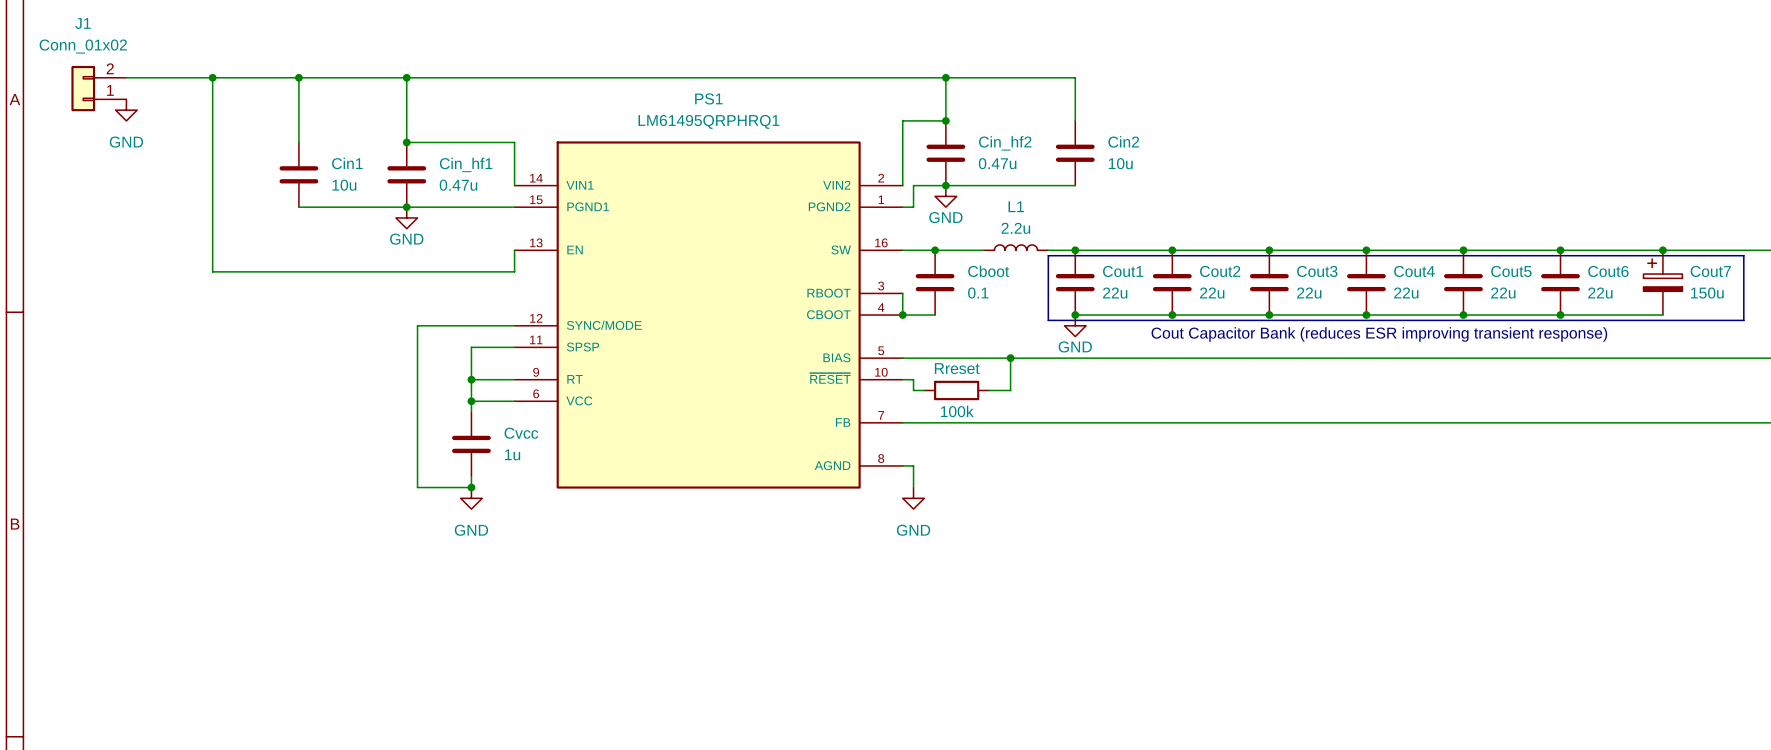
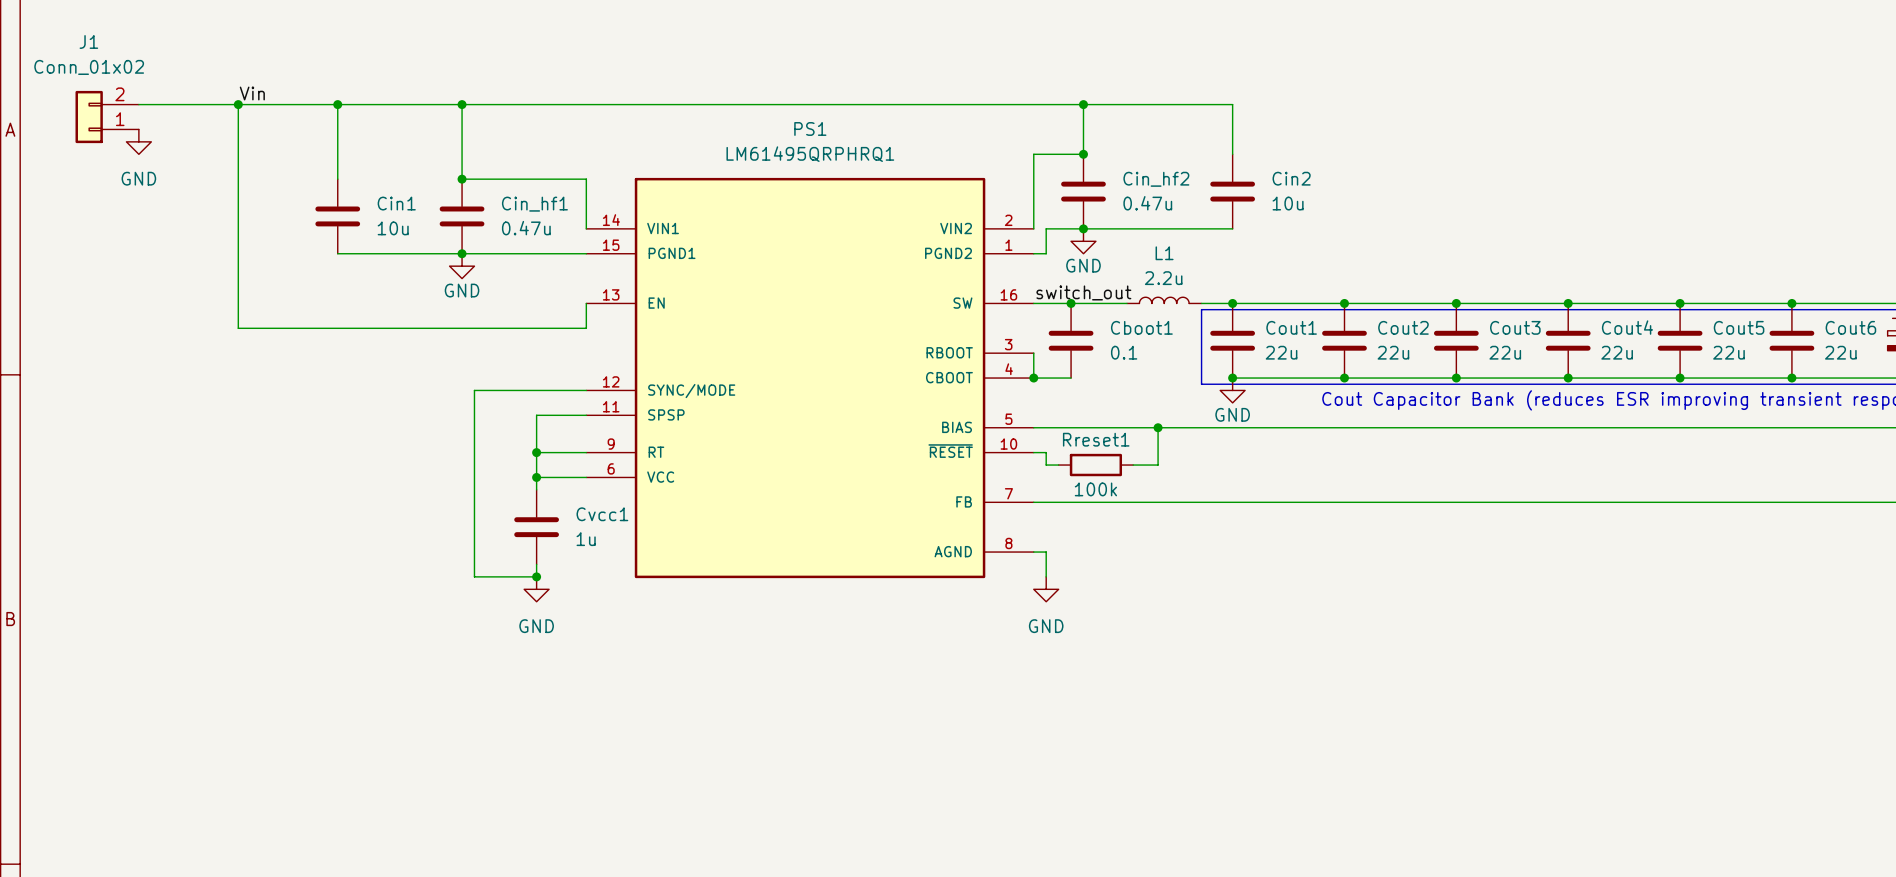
label: none -> Vin (252, 93)
label: none -> switch_out (1083, 292)
Cboot name: Cboot (988, 271) -> Cboot1 (1141, 327)
Rreset name: Rreset (957, 368) -> Rreset1 (1096, 439)
Cvcc name: Cvcc (521, 433) -> Cvcc1 (602, 514)

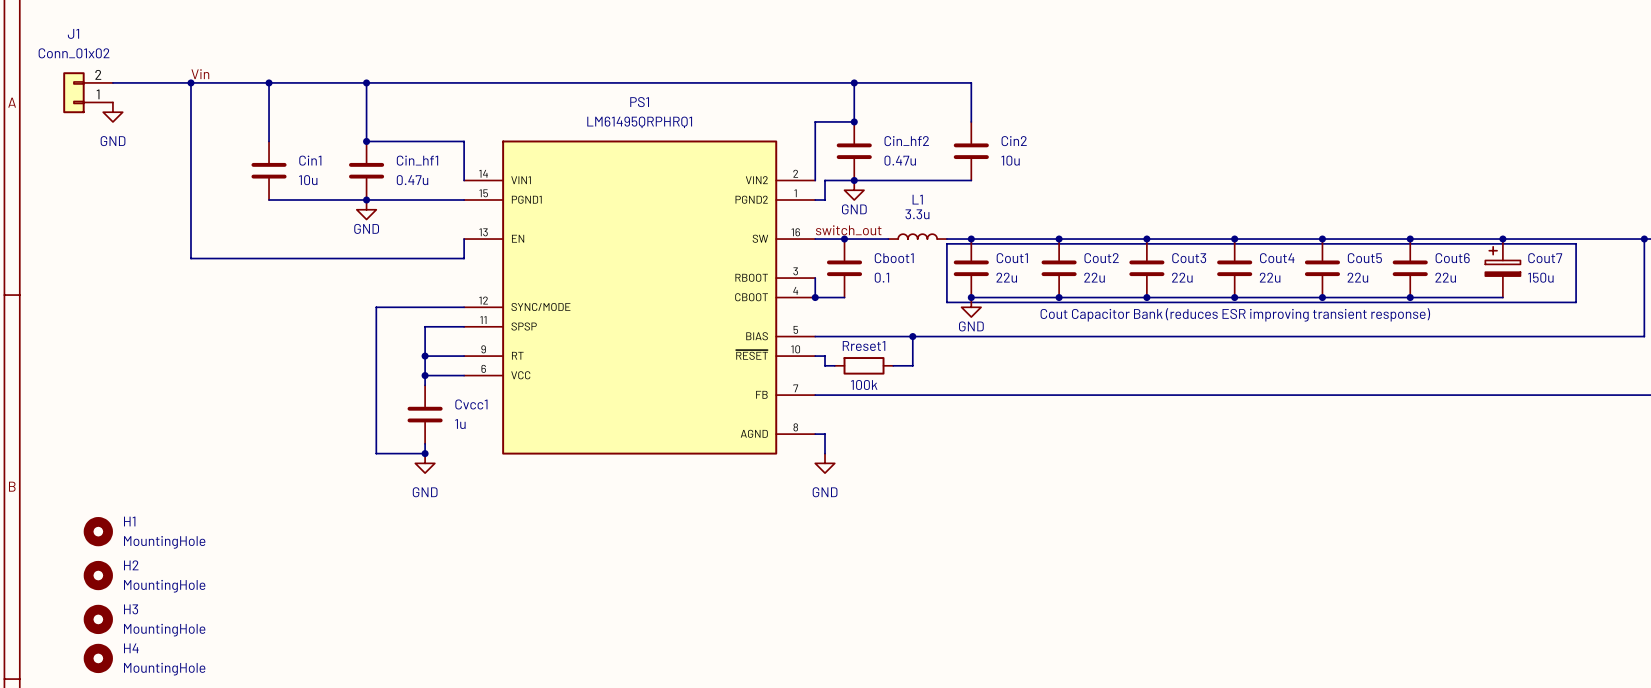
L1 value: 2.2u (1163, 278) -> 3.3u (917, 214)
H1: none -> MountingHole (98, 531)
H2: none -> MountingHole (98, 575)
H3: none -> MountingHole (98, 619)
H4: none -> MountingHole (98, 658)

